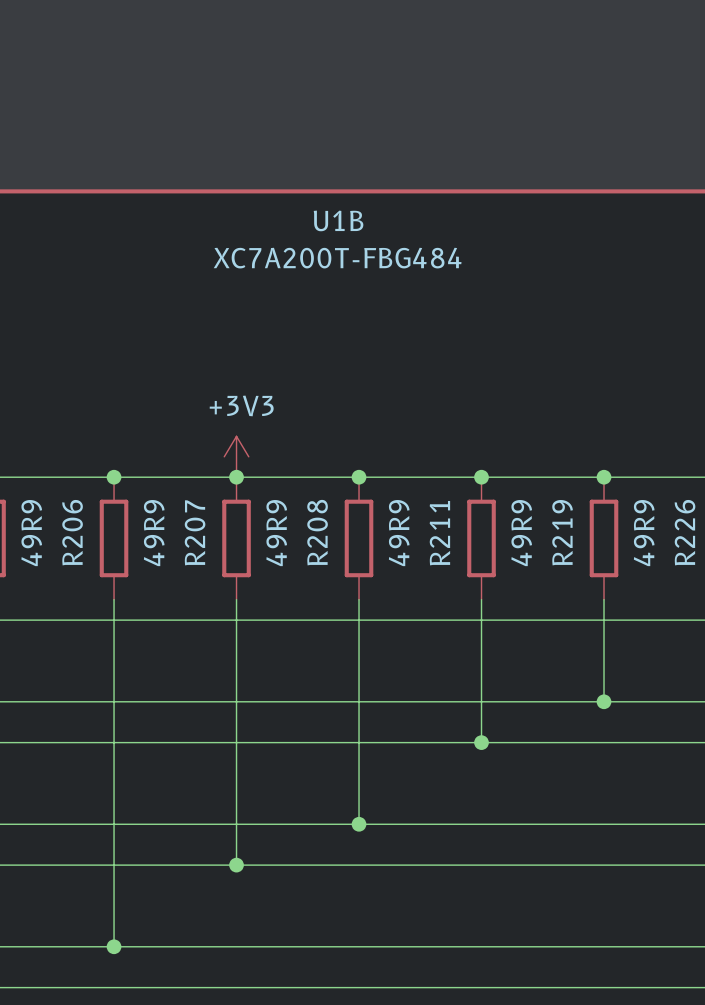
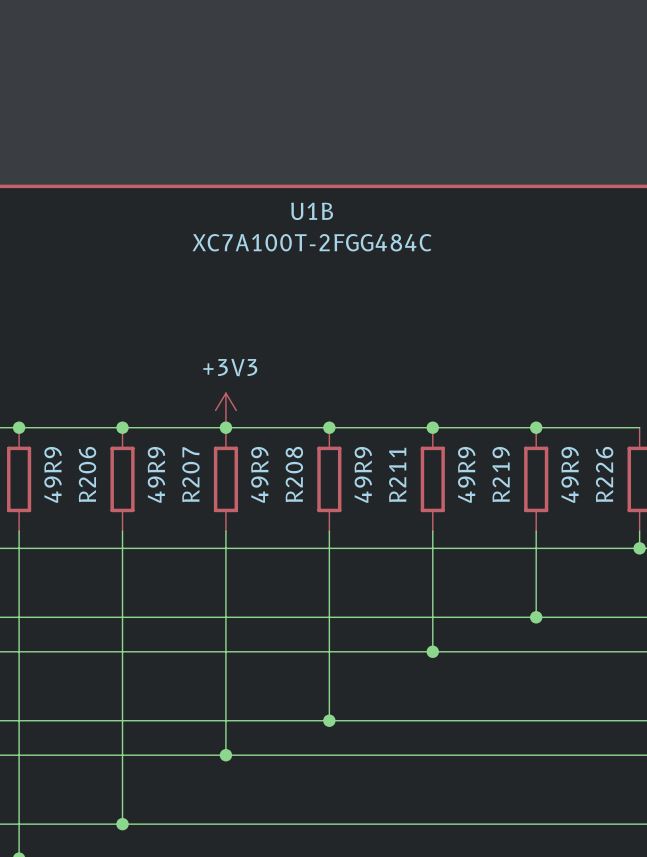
U1B value: XC7A200T-FBG484 (337, 258) -> XC7A100T-2FGG484C (311, 242)

